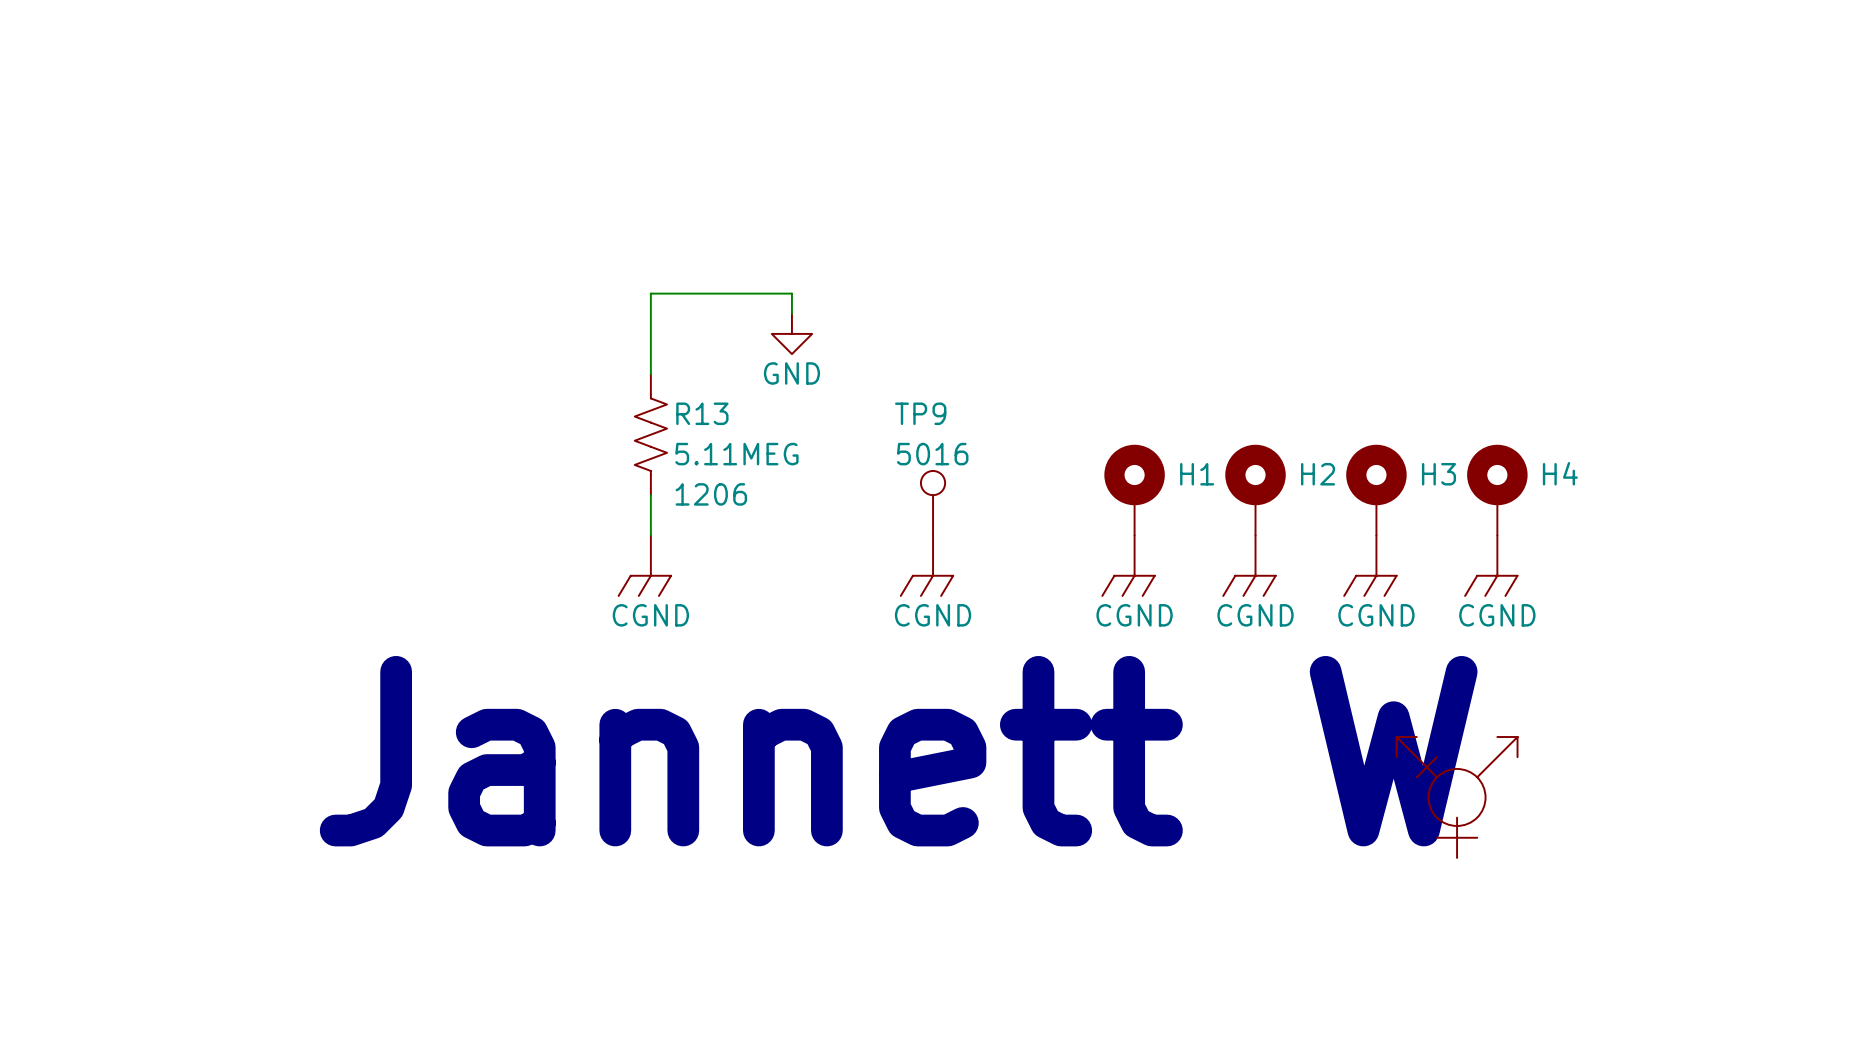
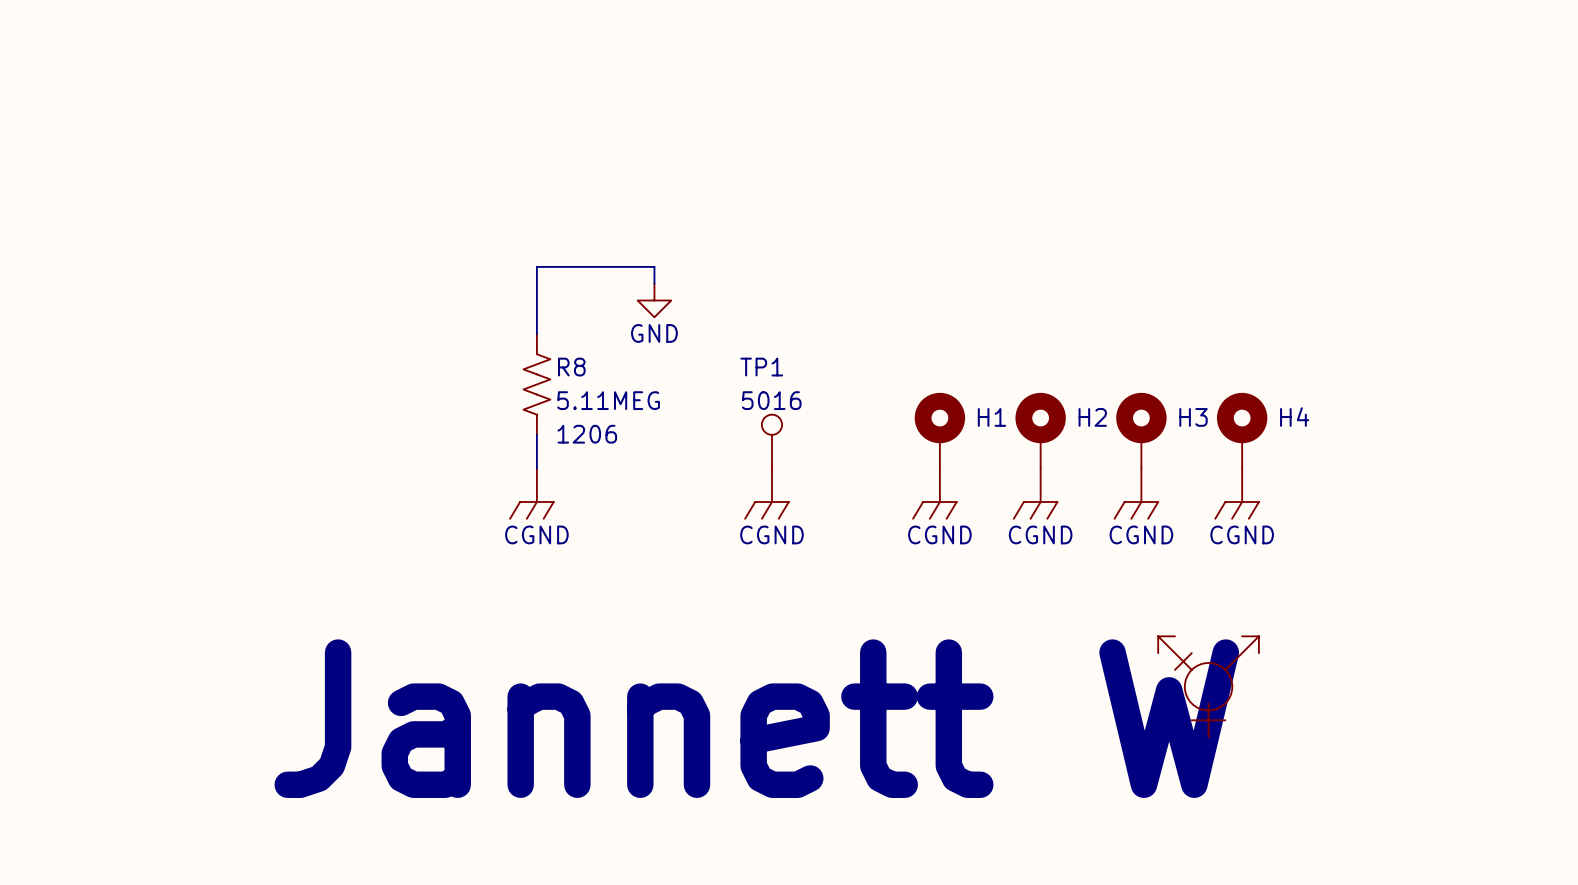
R13 name: R13 (702, 413) -> R8 (571, 367)
TP9 name: TP9 (920, 413) -> TP1 (761, 367)
text position: Jannett W (898, 751) -> Jannett W (756, 718)

